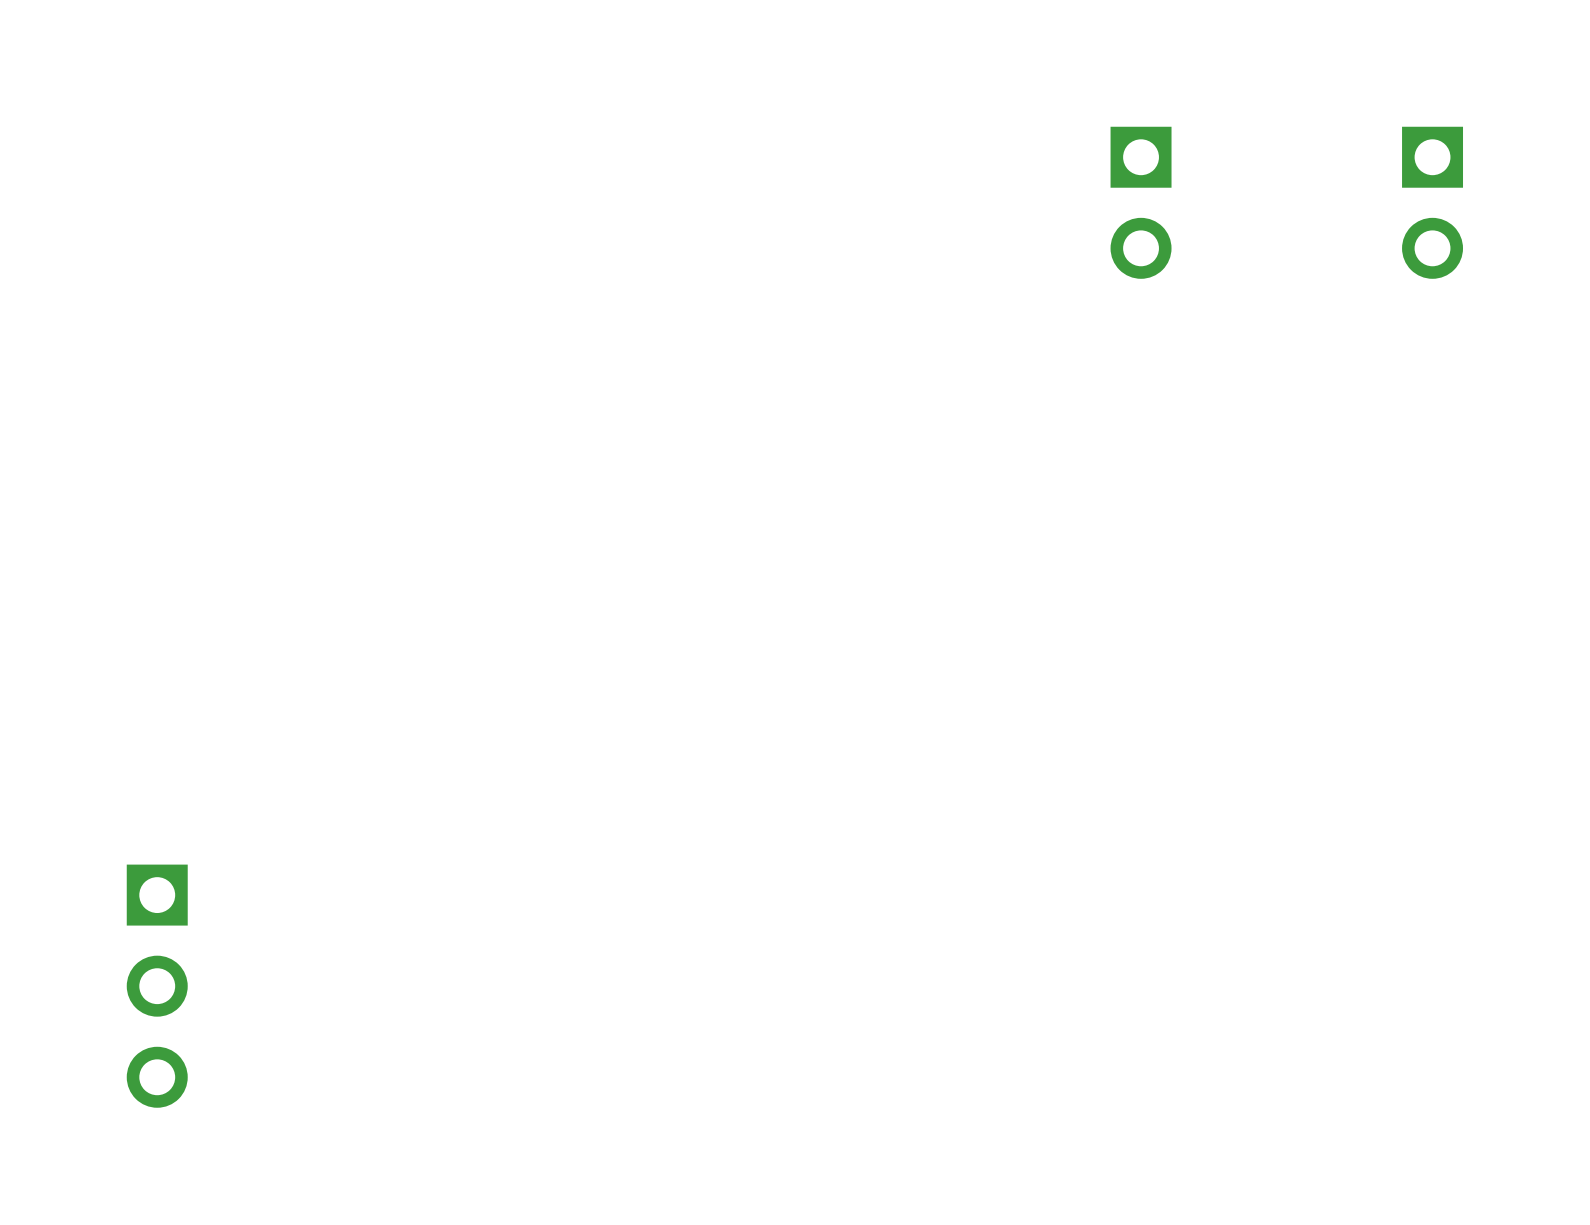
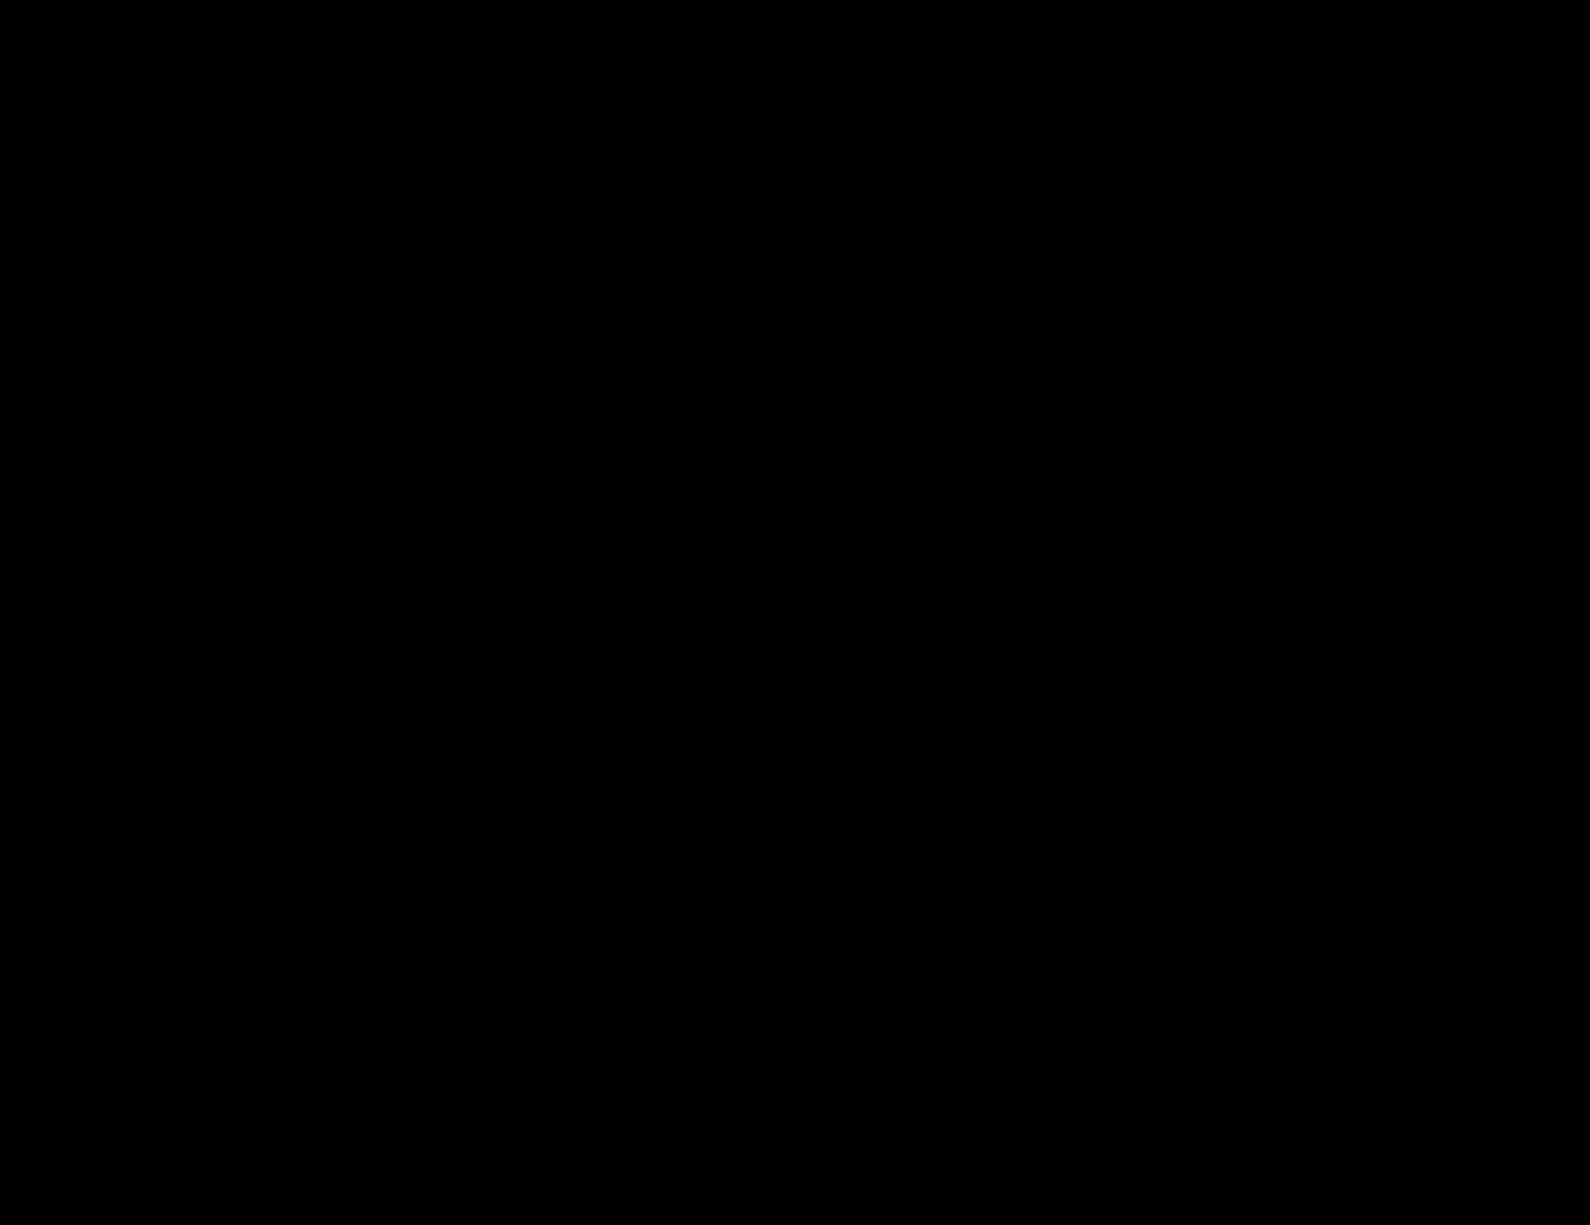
part: (1141, 202) -> none
part: (1432, 202) -> none
part: (157, 986) -> none

